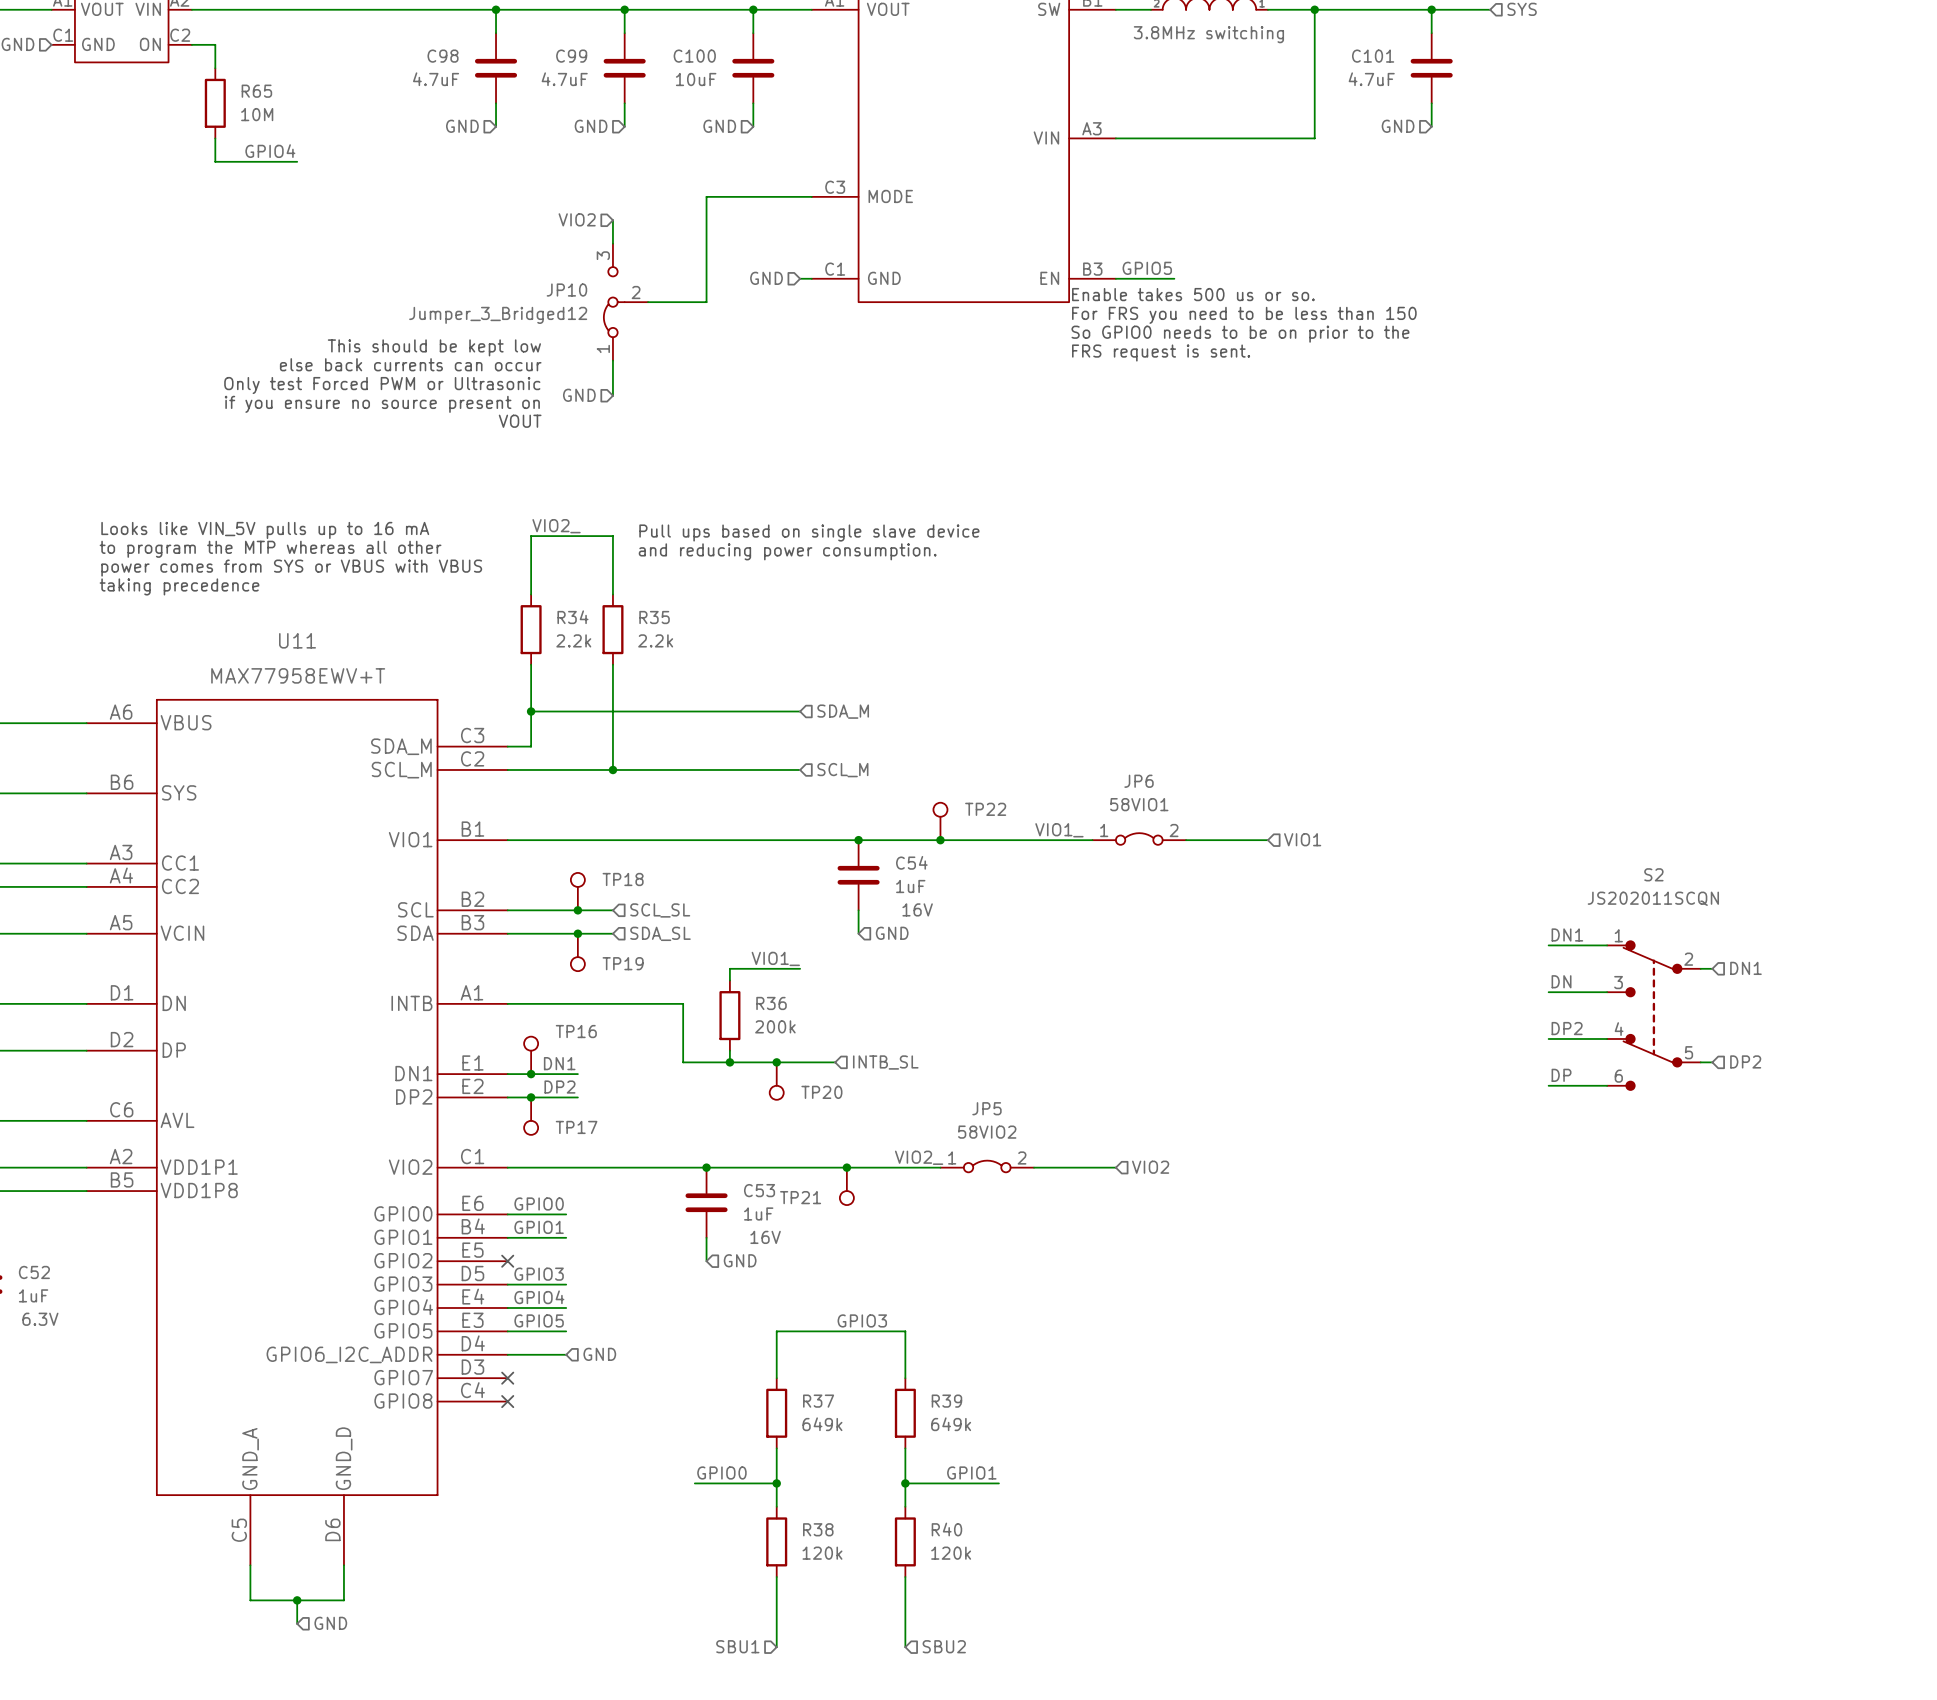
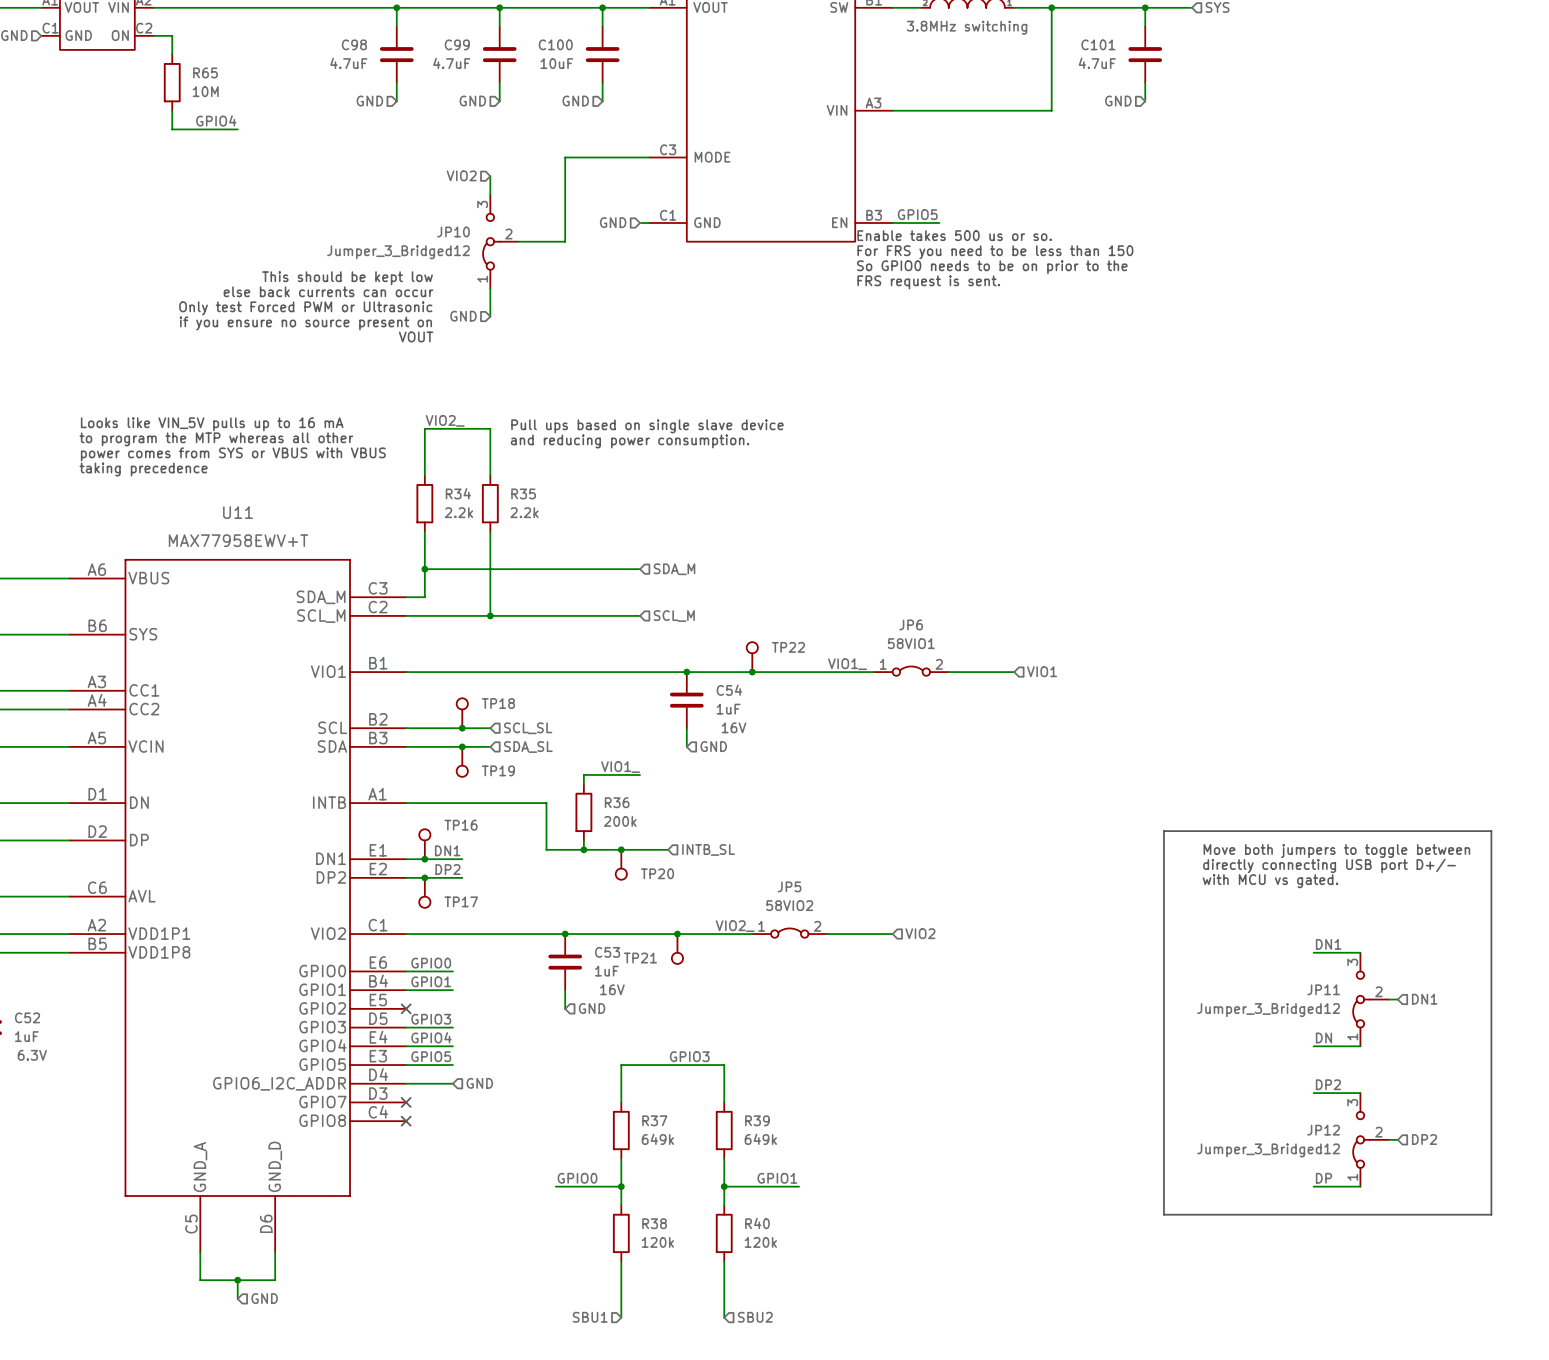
label: DN1 (1567, 934) -> none
wire: (1548, 945) (1607, 945) -> none
wire: (1700, 968) (1712, 968) -> none
hierarchical label: DN1 (1745, 968) -> none
label: DN (1561, 981) -> none
wire: (1548, 992) (1607, 992) -> none
S2: JS202011SCQN (1653, 1015) -> none
label: DP2 (1567, 1028) -> none
line: none -> (1163, 831) (1163, 1214) (1491, 1214) (1491, 831) (1163, 831)
hierarchical label: DP2 (1745, 1061) -> none
wire: (1700, 1062) (1712, 1062) -> (1388, 999) (1397, 999)
text: none -> Move both jumpers to toggle between (1336, 851)
label: DP (1561, 1075) -> none
text: none -> directly connecting USB port D+/- (1329, 865)
wire: (1548, 1085) (1607, 1085) -> (1313, 952) (1360, 952)
text: none -> with MCU vs gated. (1270, 881)
label: none -> DN1 (1328, 944)
JP11: none -> Jumper_3_Bridged12 (1370, 999)
hierarchical label: none -> DN1 (1424, 999)
label: none -> DN (1323, 1037)
wire: none -> (1313, 1046) (1360, 1046)
label: none -> DP2 (1328, 1084)
wire: none -> (1313, 1093) (1360, 1093)
JP12: none -> Jumper_3_Bridged12 (1370, 1139)
wire: none -> (1388, 1139) (1397, 1139)
hierarchical label: none -> DP2 (1424, 1139)
label: none -> DP (1323, 1178)
wire: none -> (1313, 1186) (1360, 1186)

